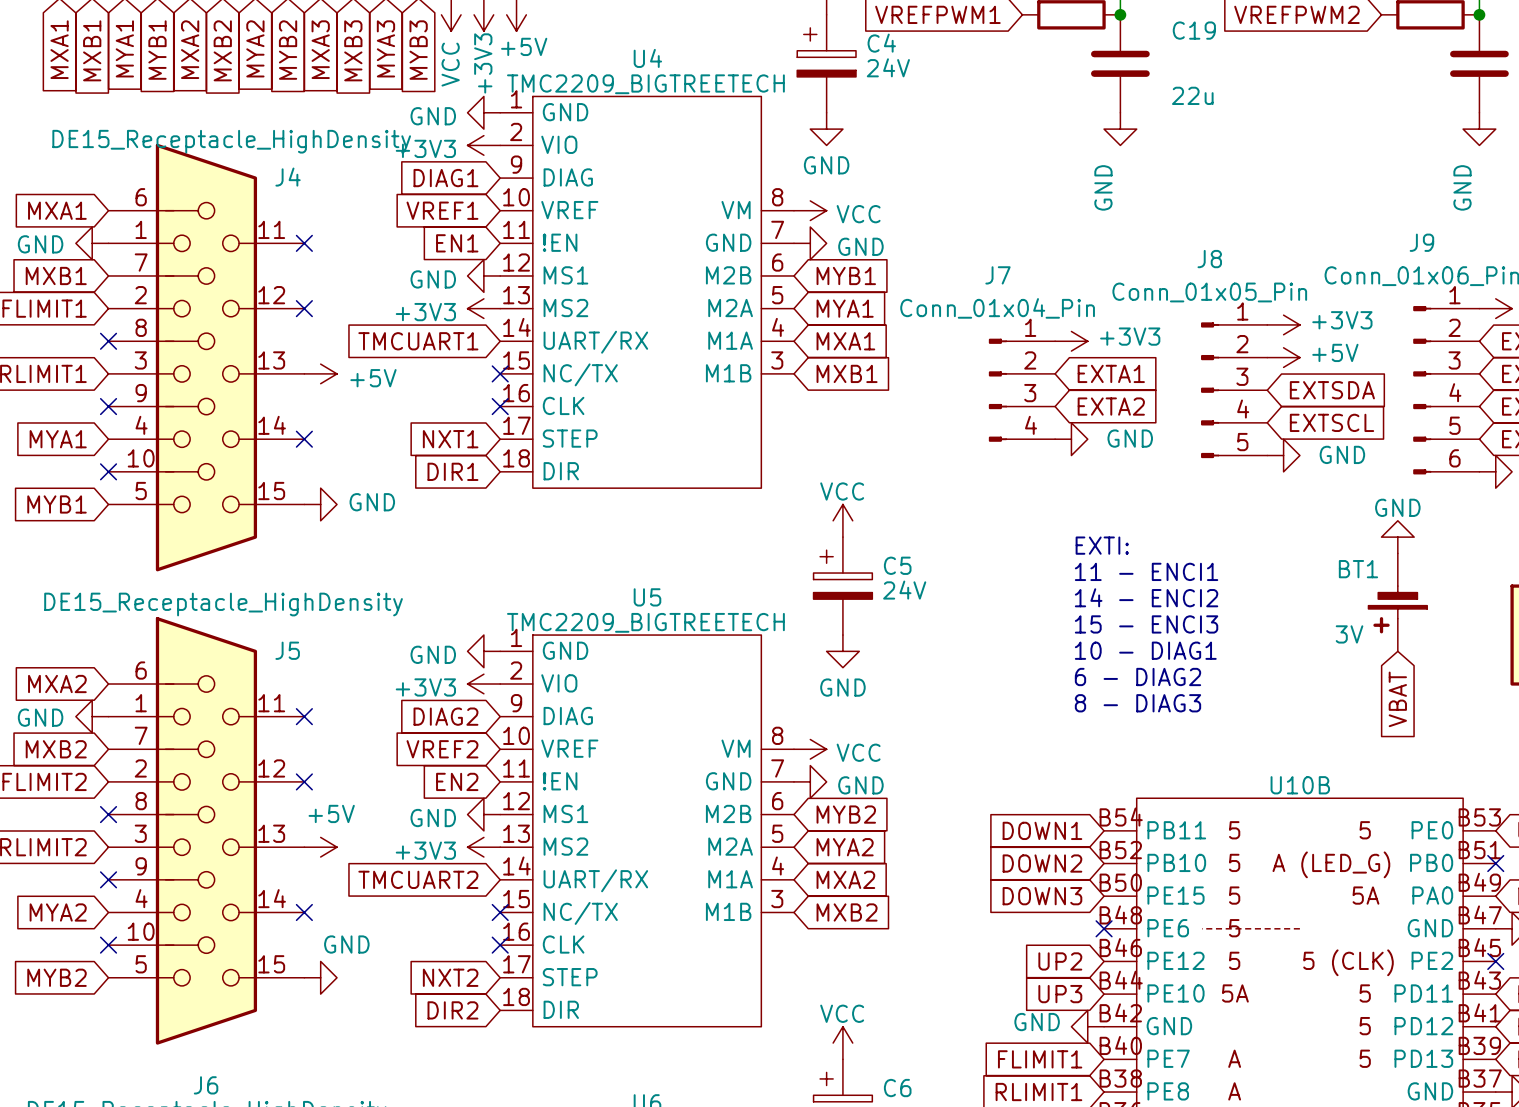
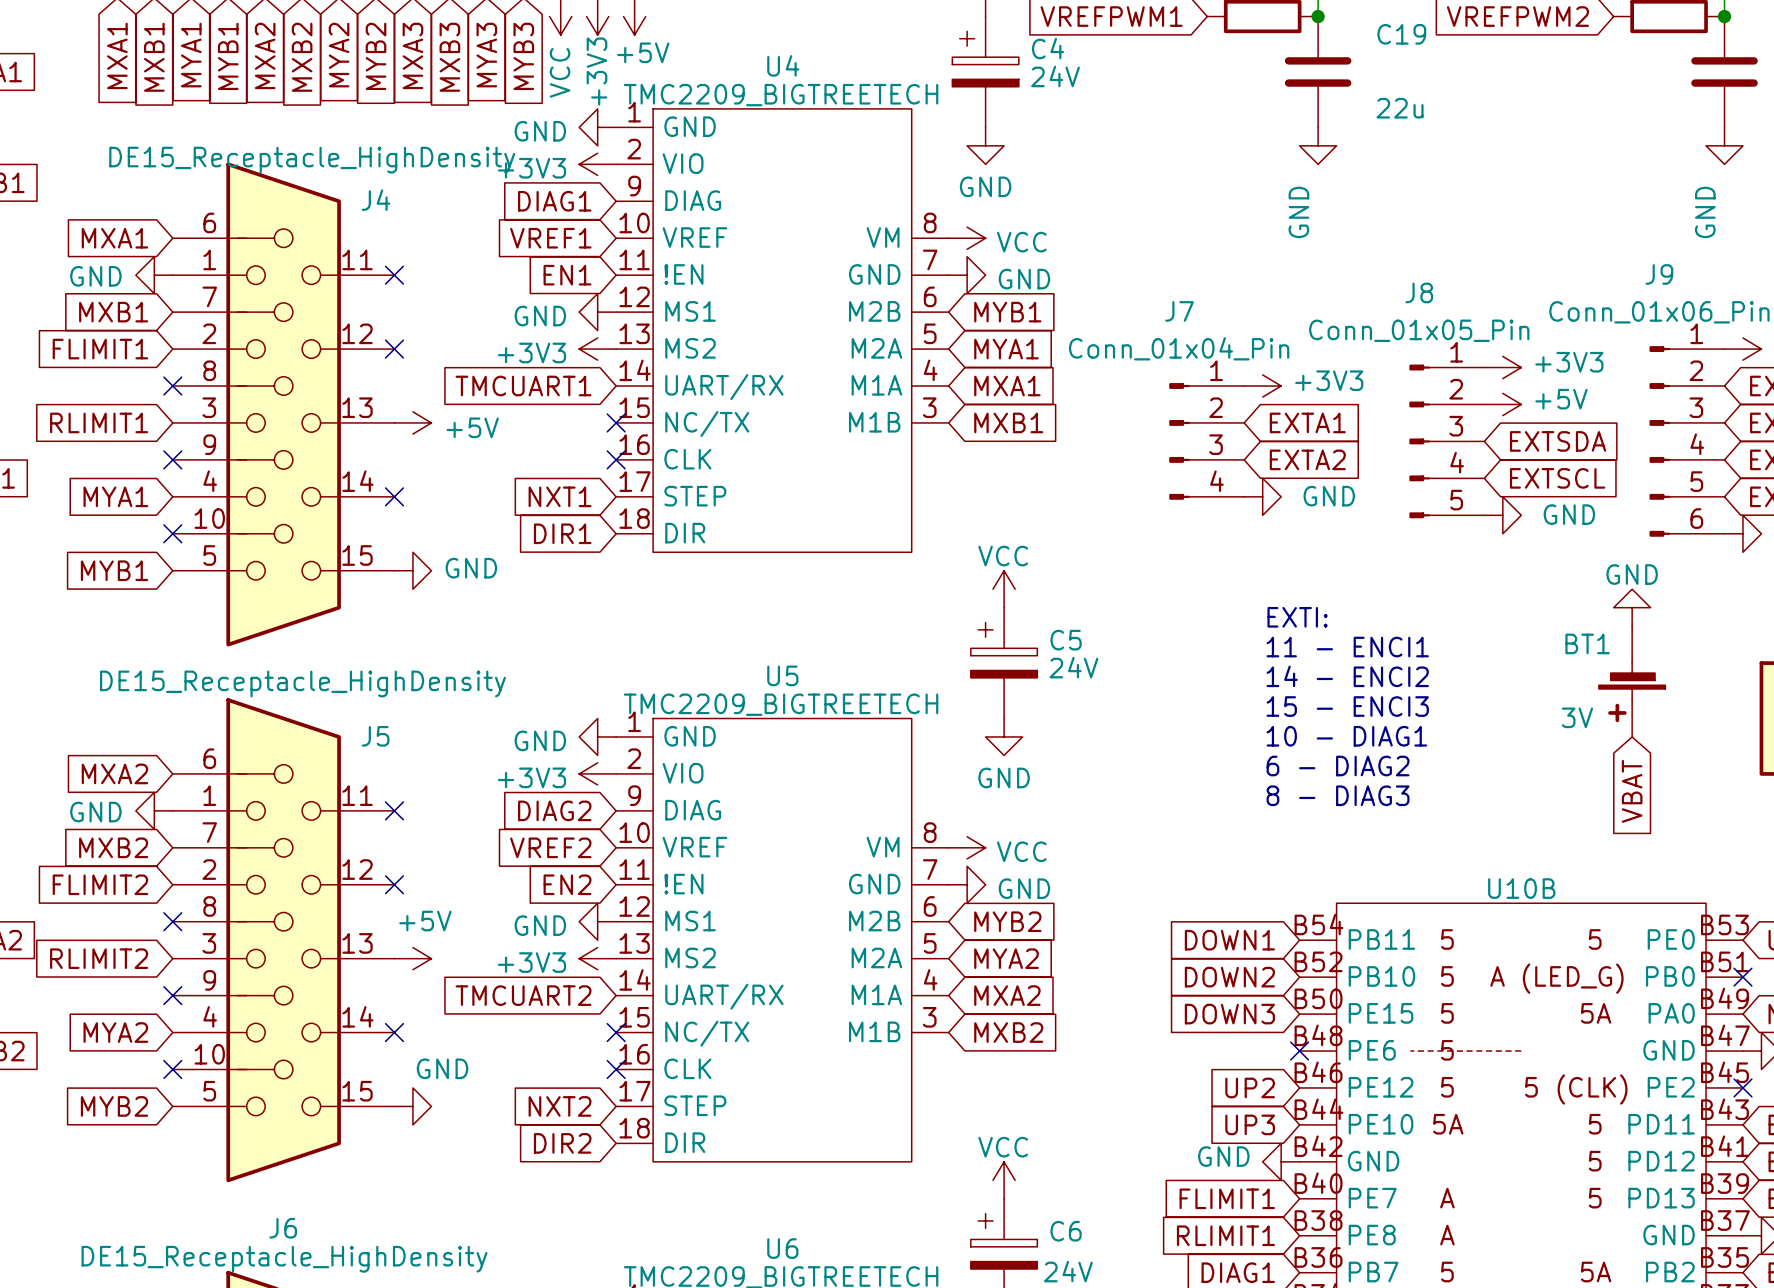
BT1 symbol: [1368, 553, 1428, 652] -> [1598, 626, 1666, 737]

